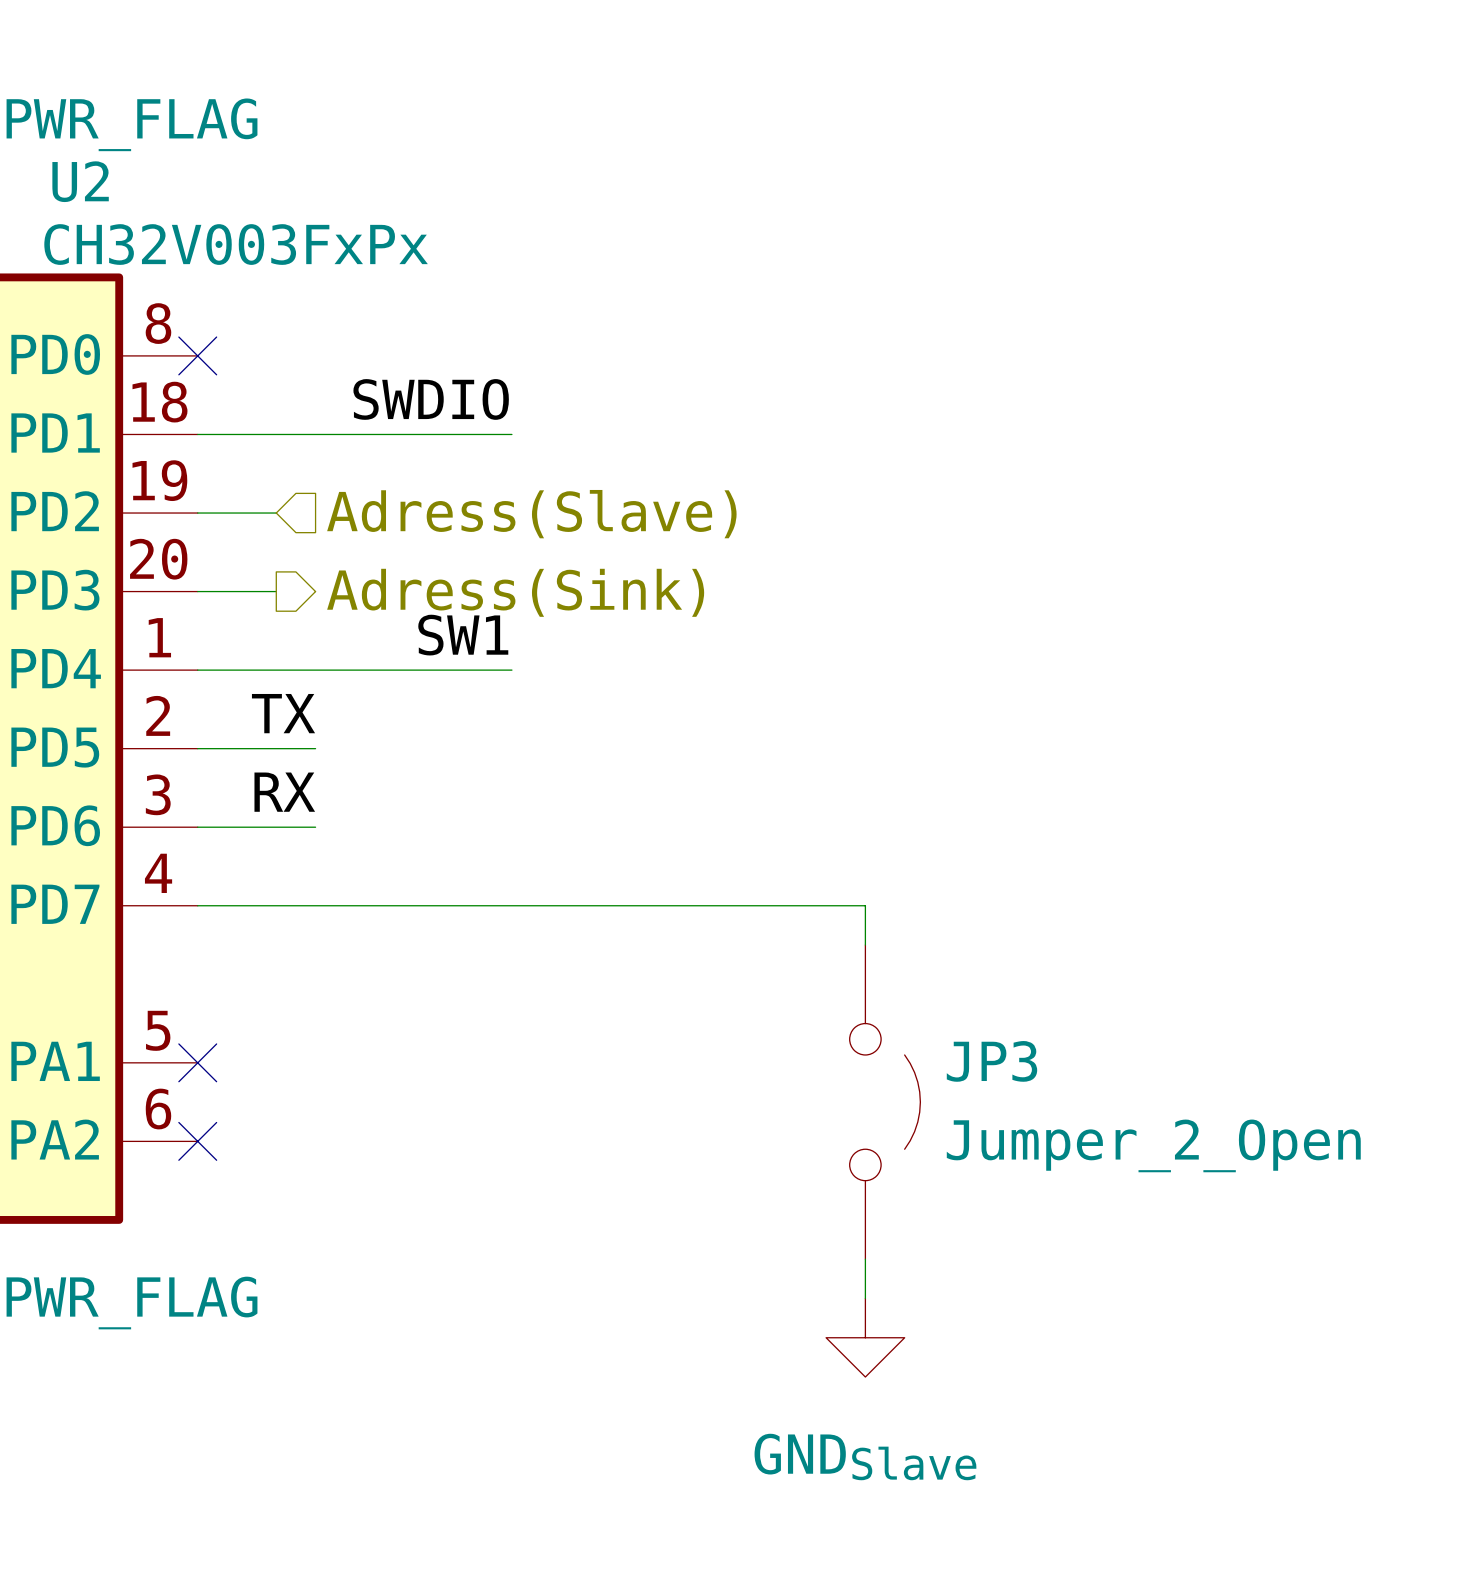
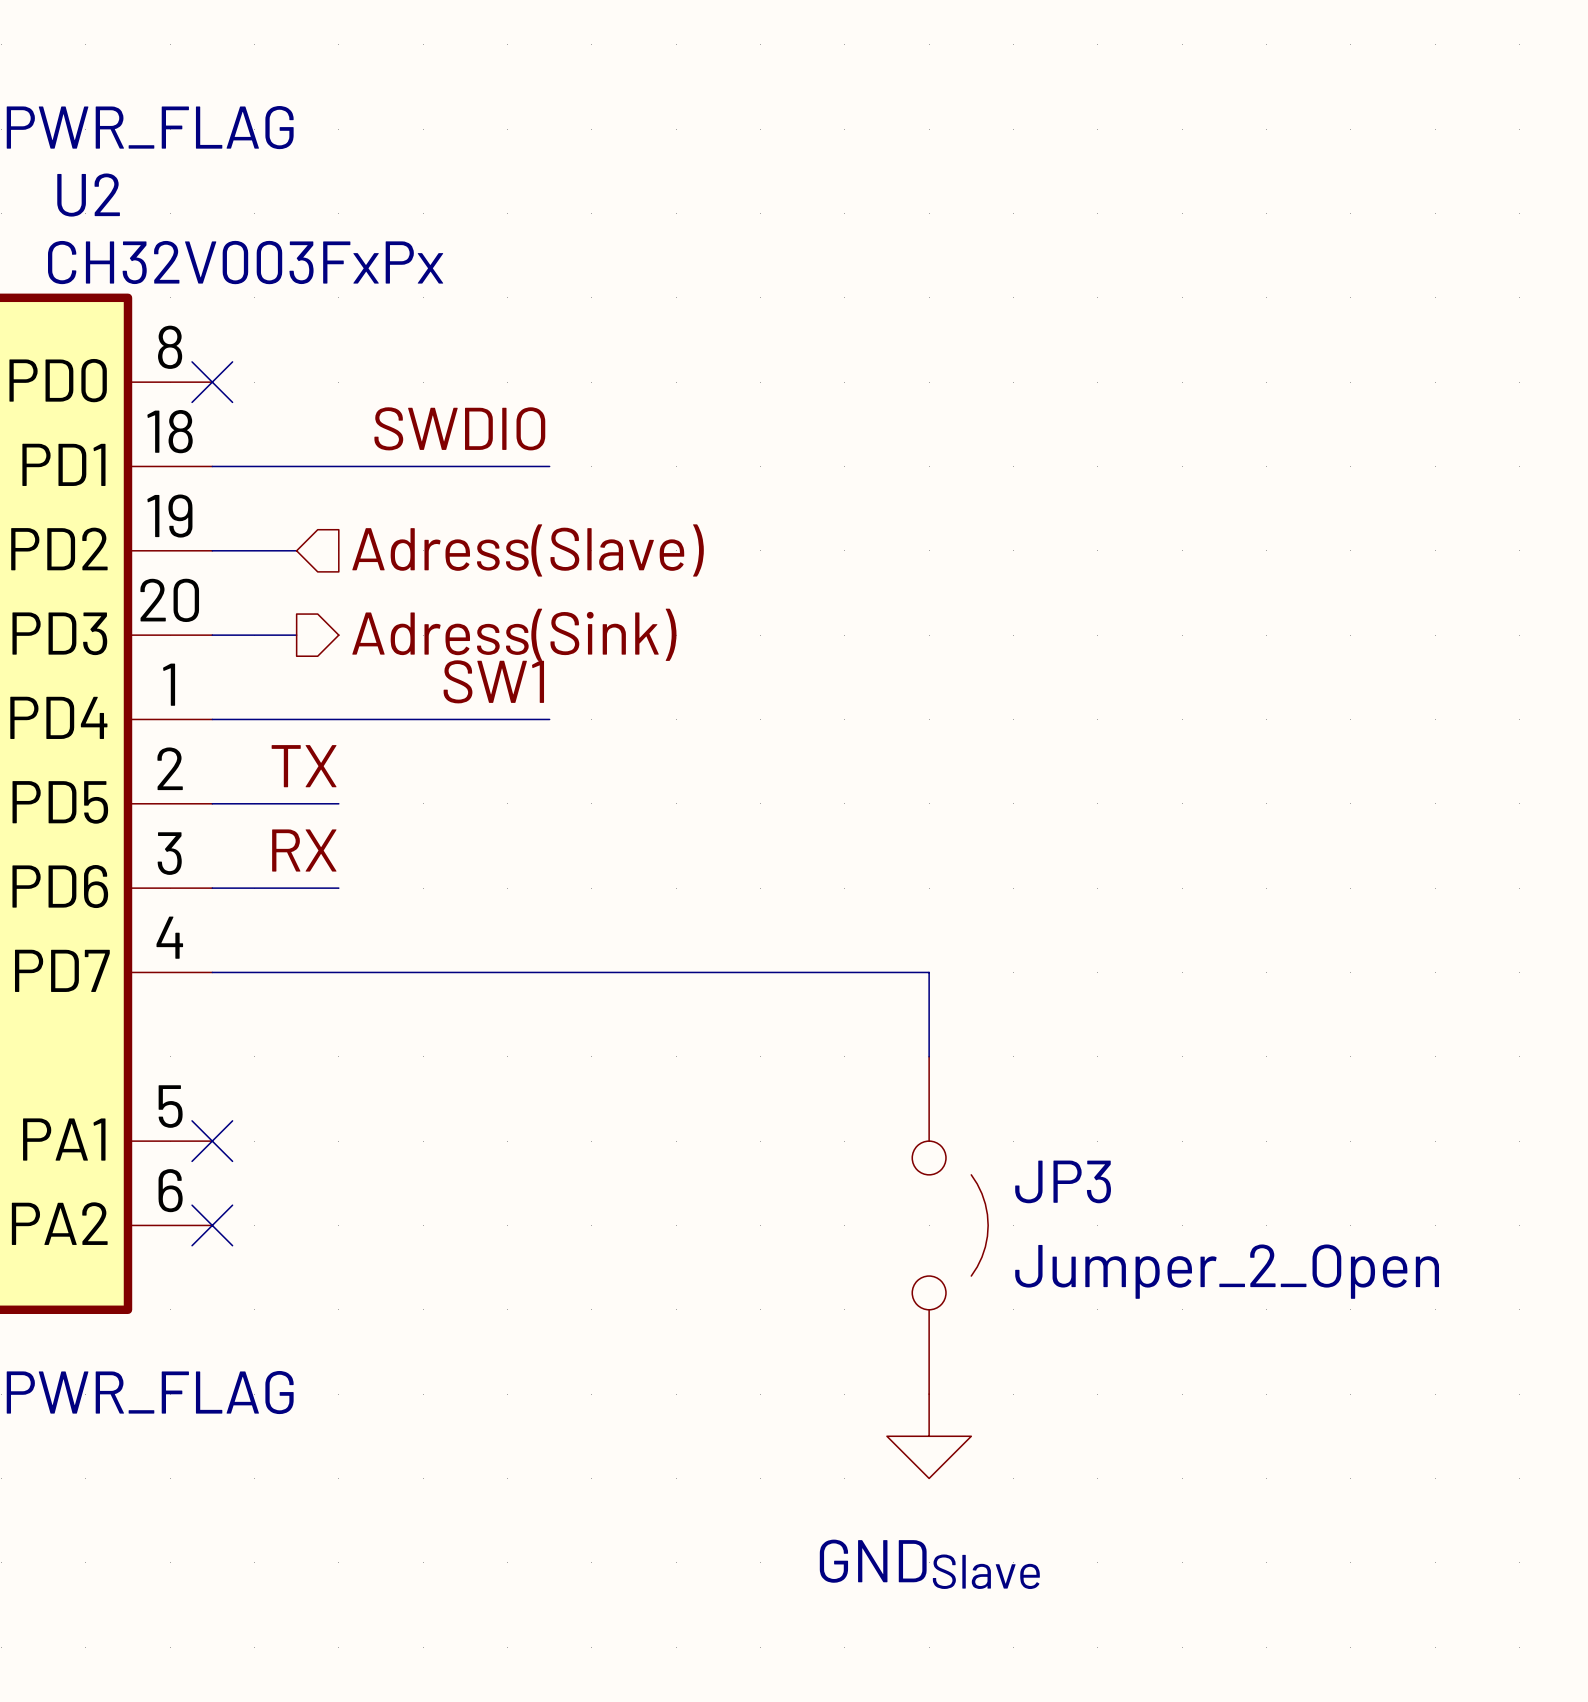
JP3 position: (885, 1102) -> (950, 1225)

